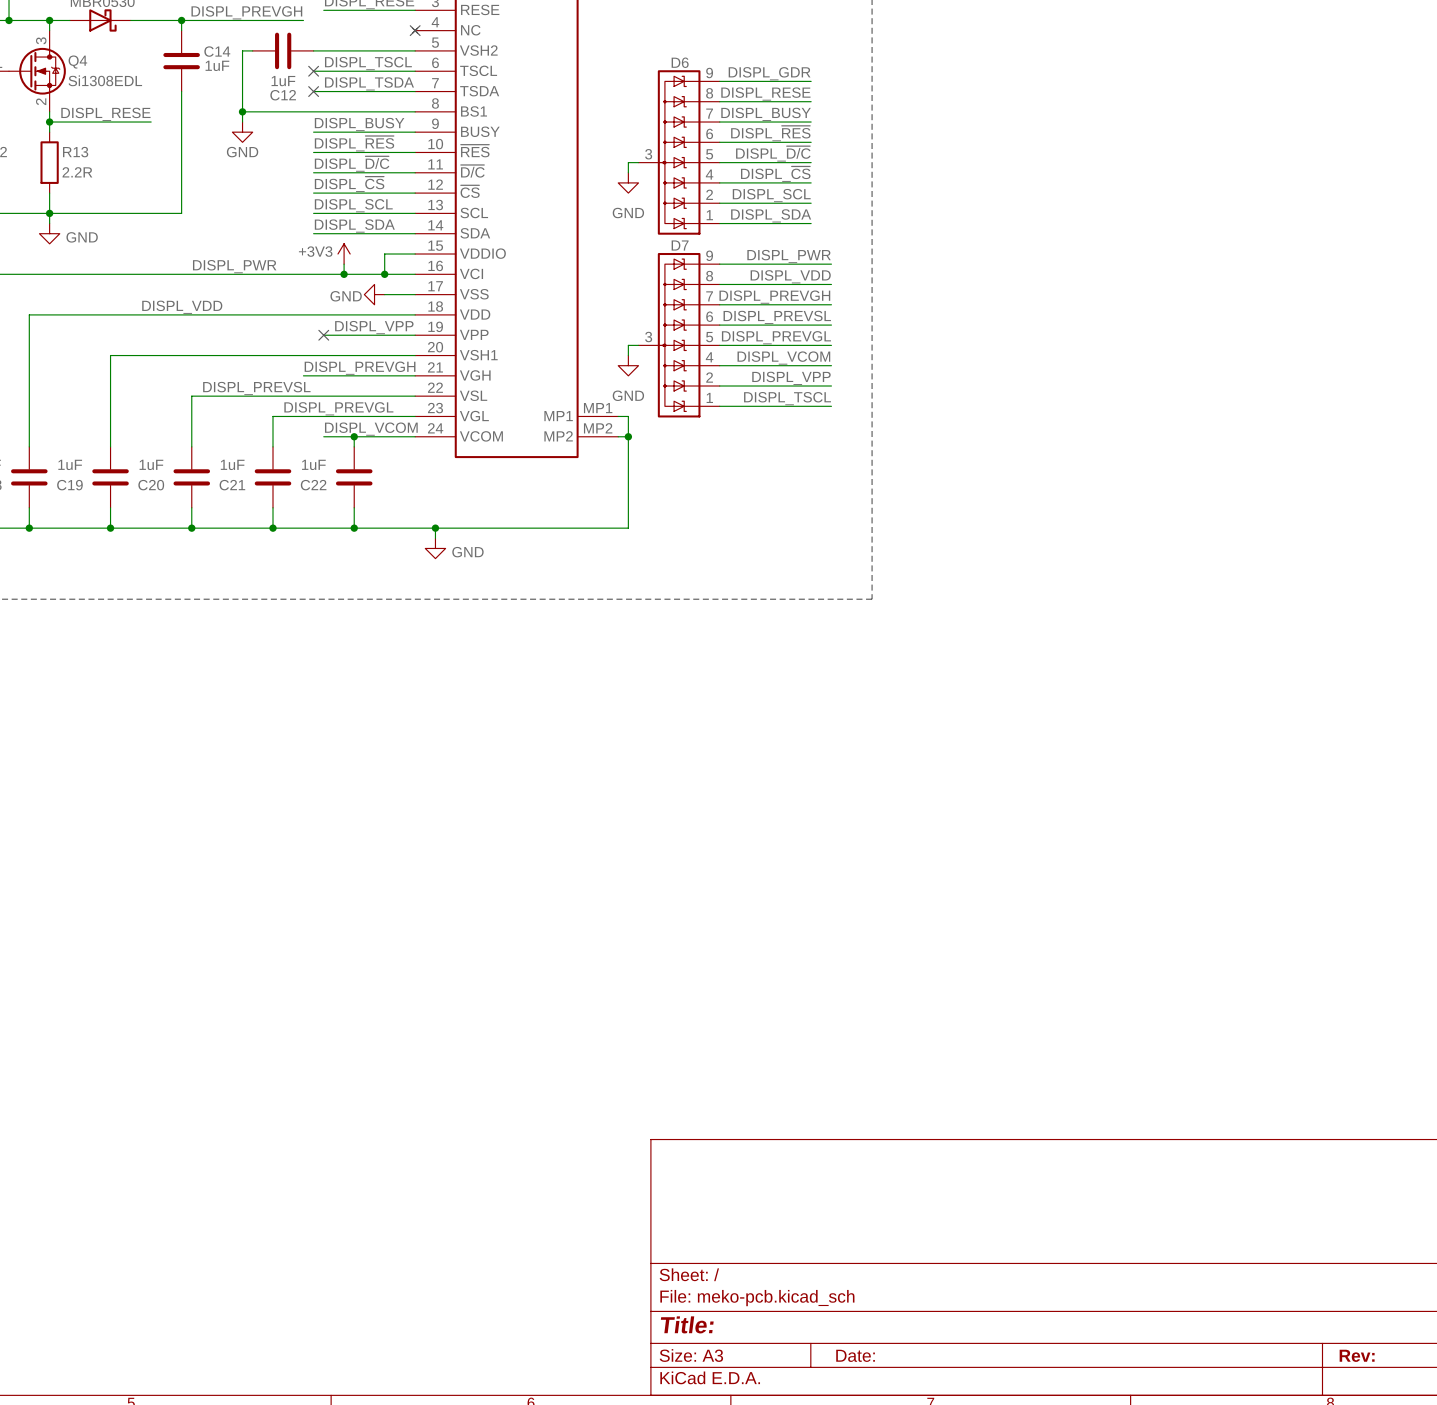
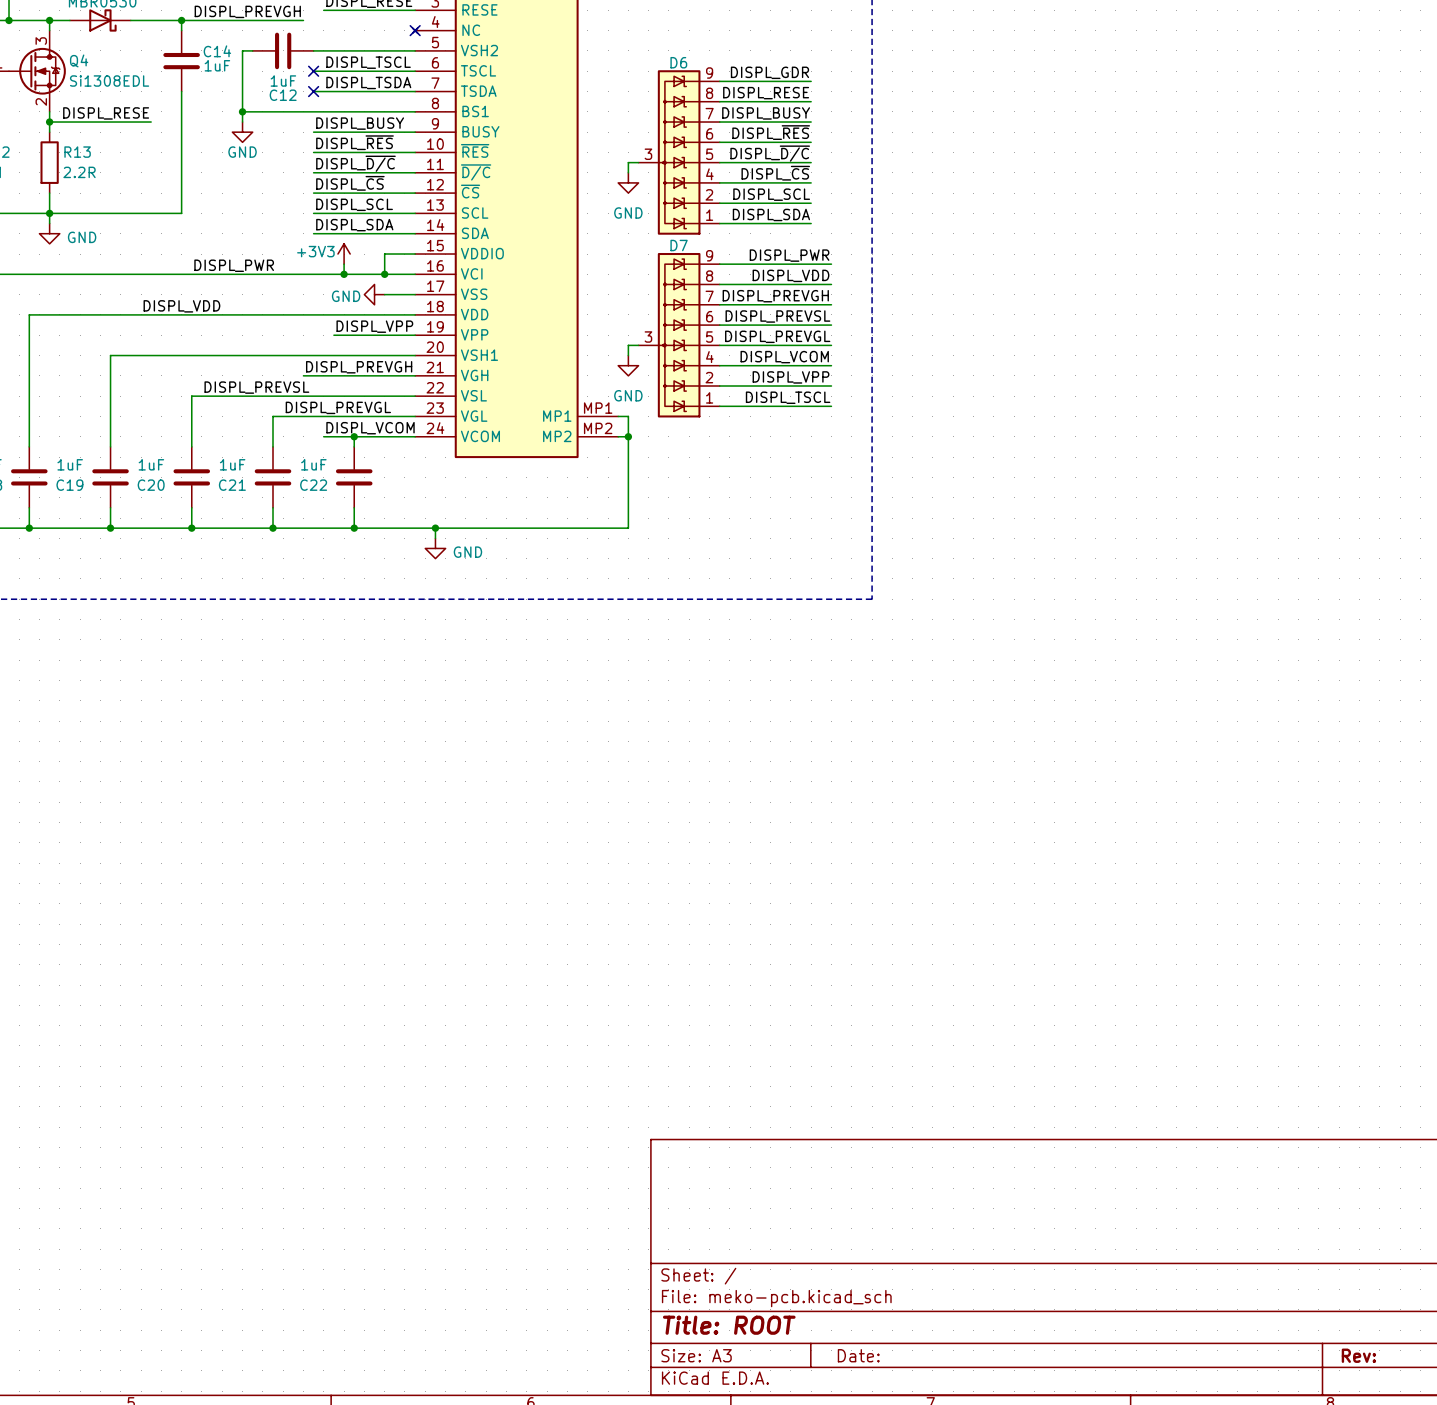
wire: (323, 335) (333, 335) -> none
no-connect mark: (323, 335) -> none
title block: Title: (687, 1324) -> Title: ROOT (729, 1325)

